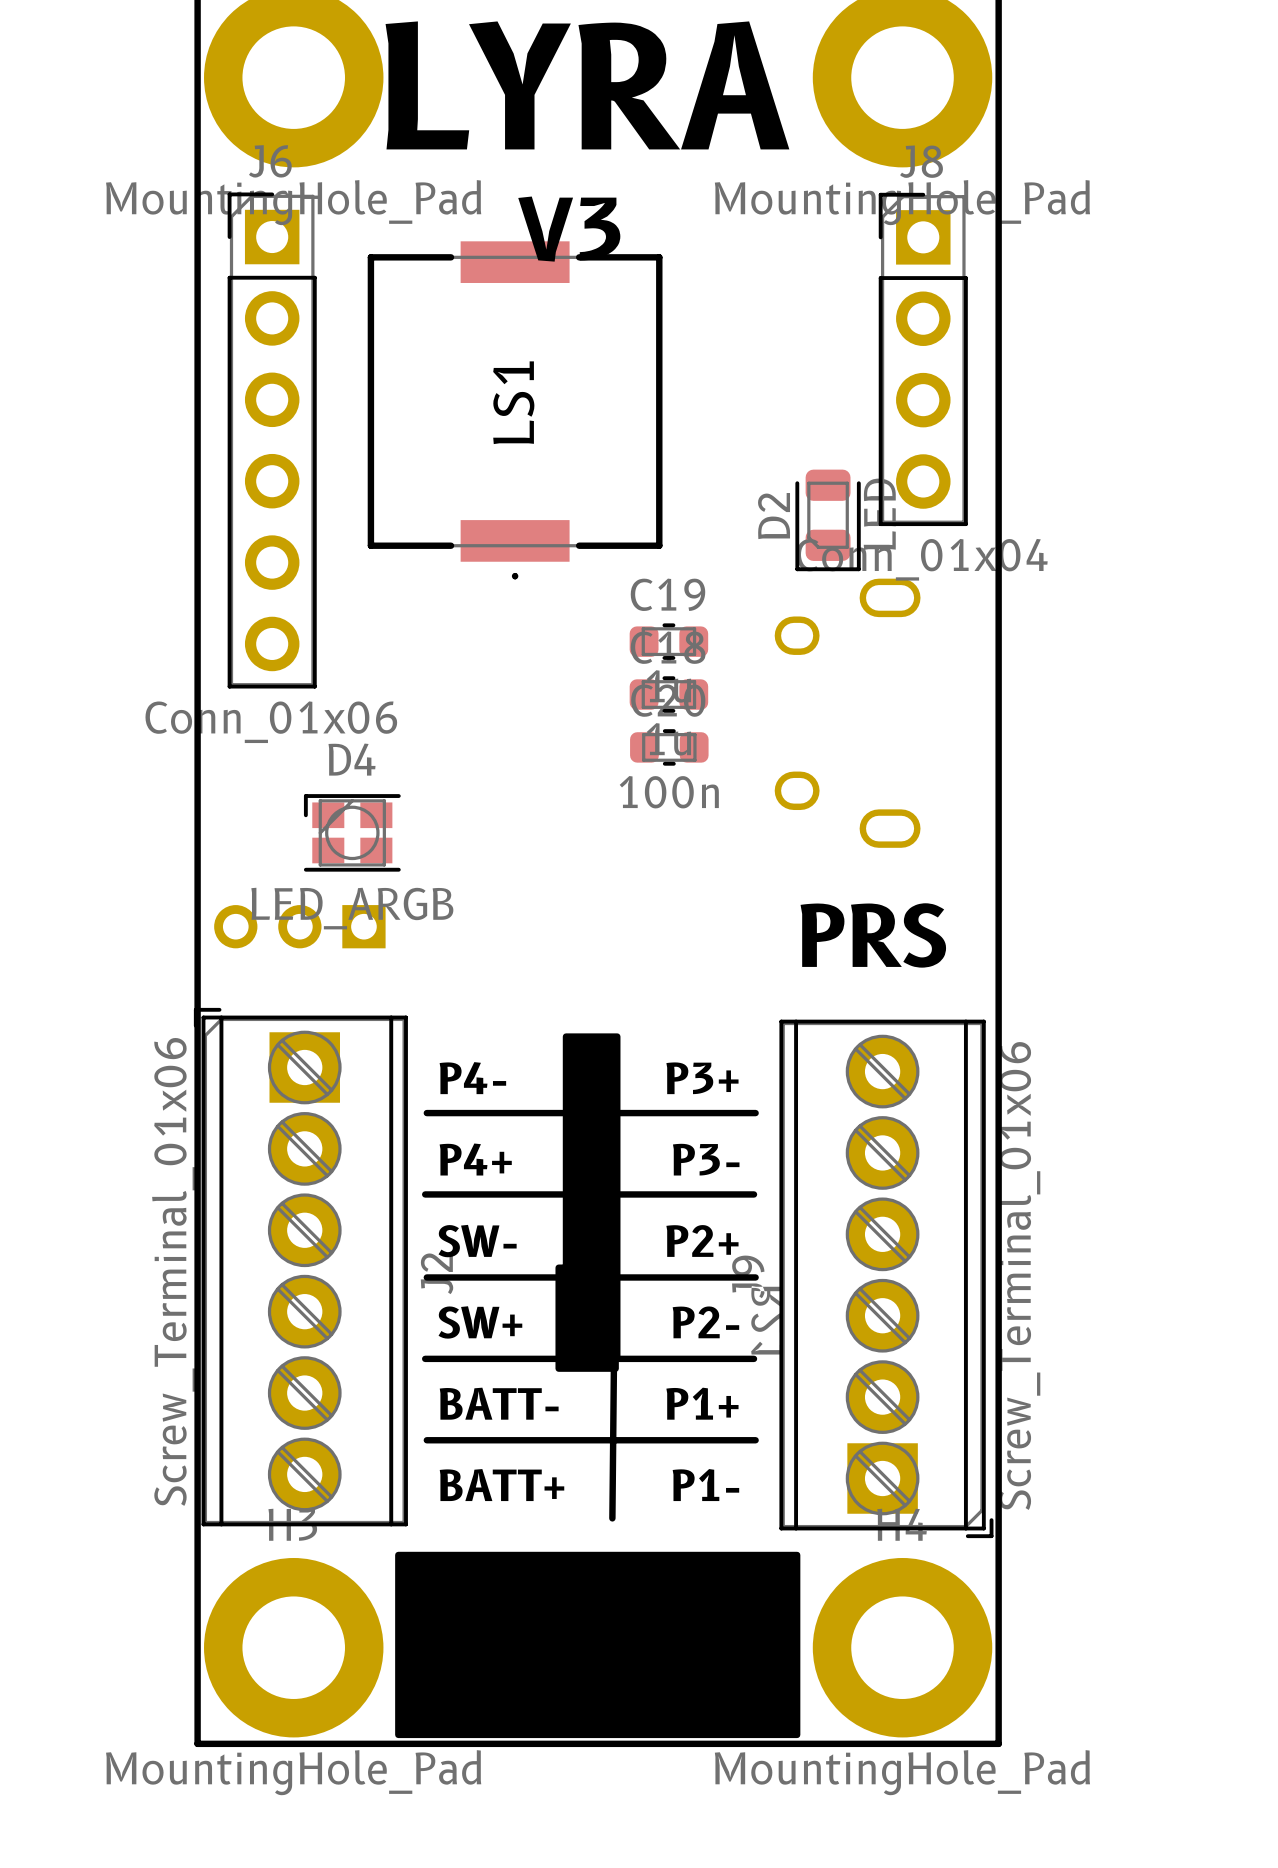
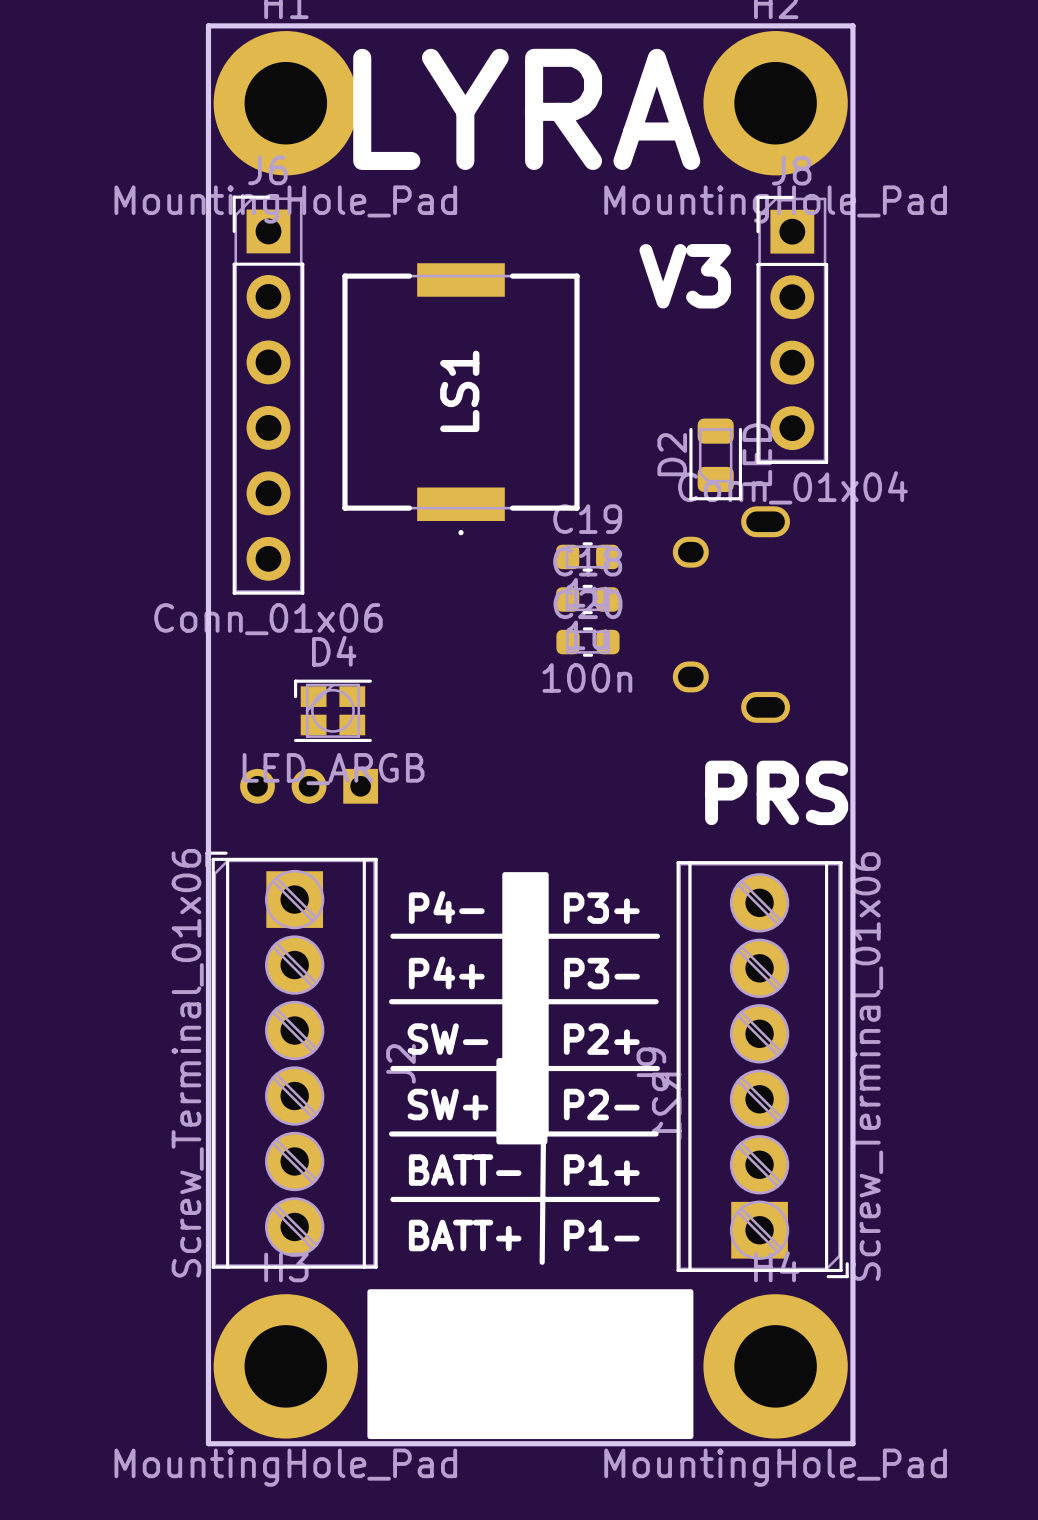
text position: V3 (569, 229) -> V3 (685, 276)
LS1 position: (515, 410) -> (460, 399)
part position: (299, 926) -> (309, 786)

